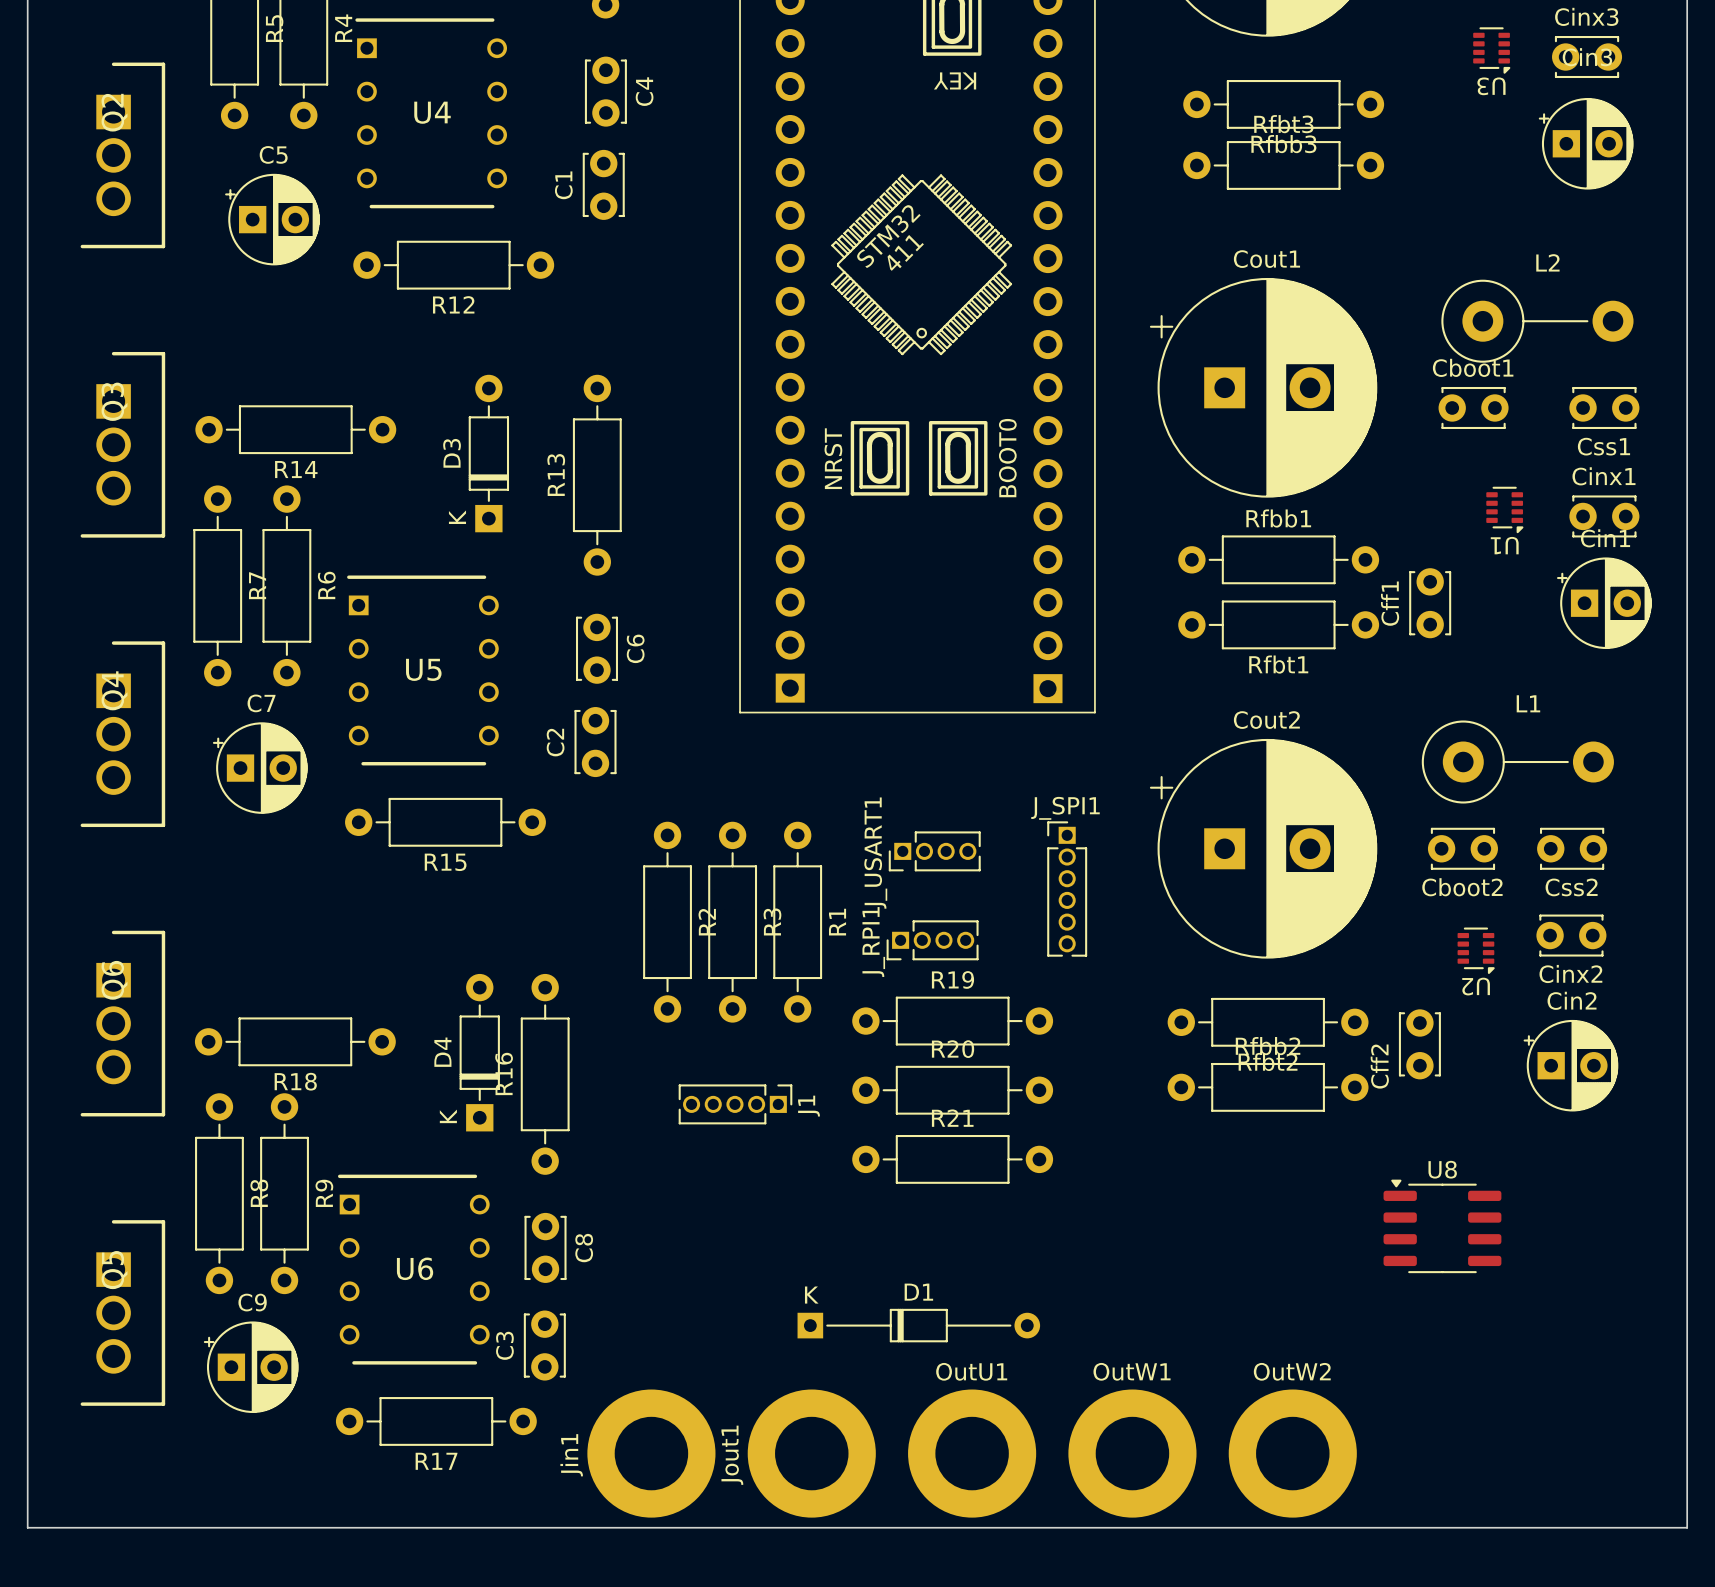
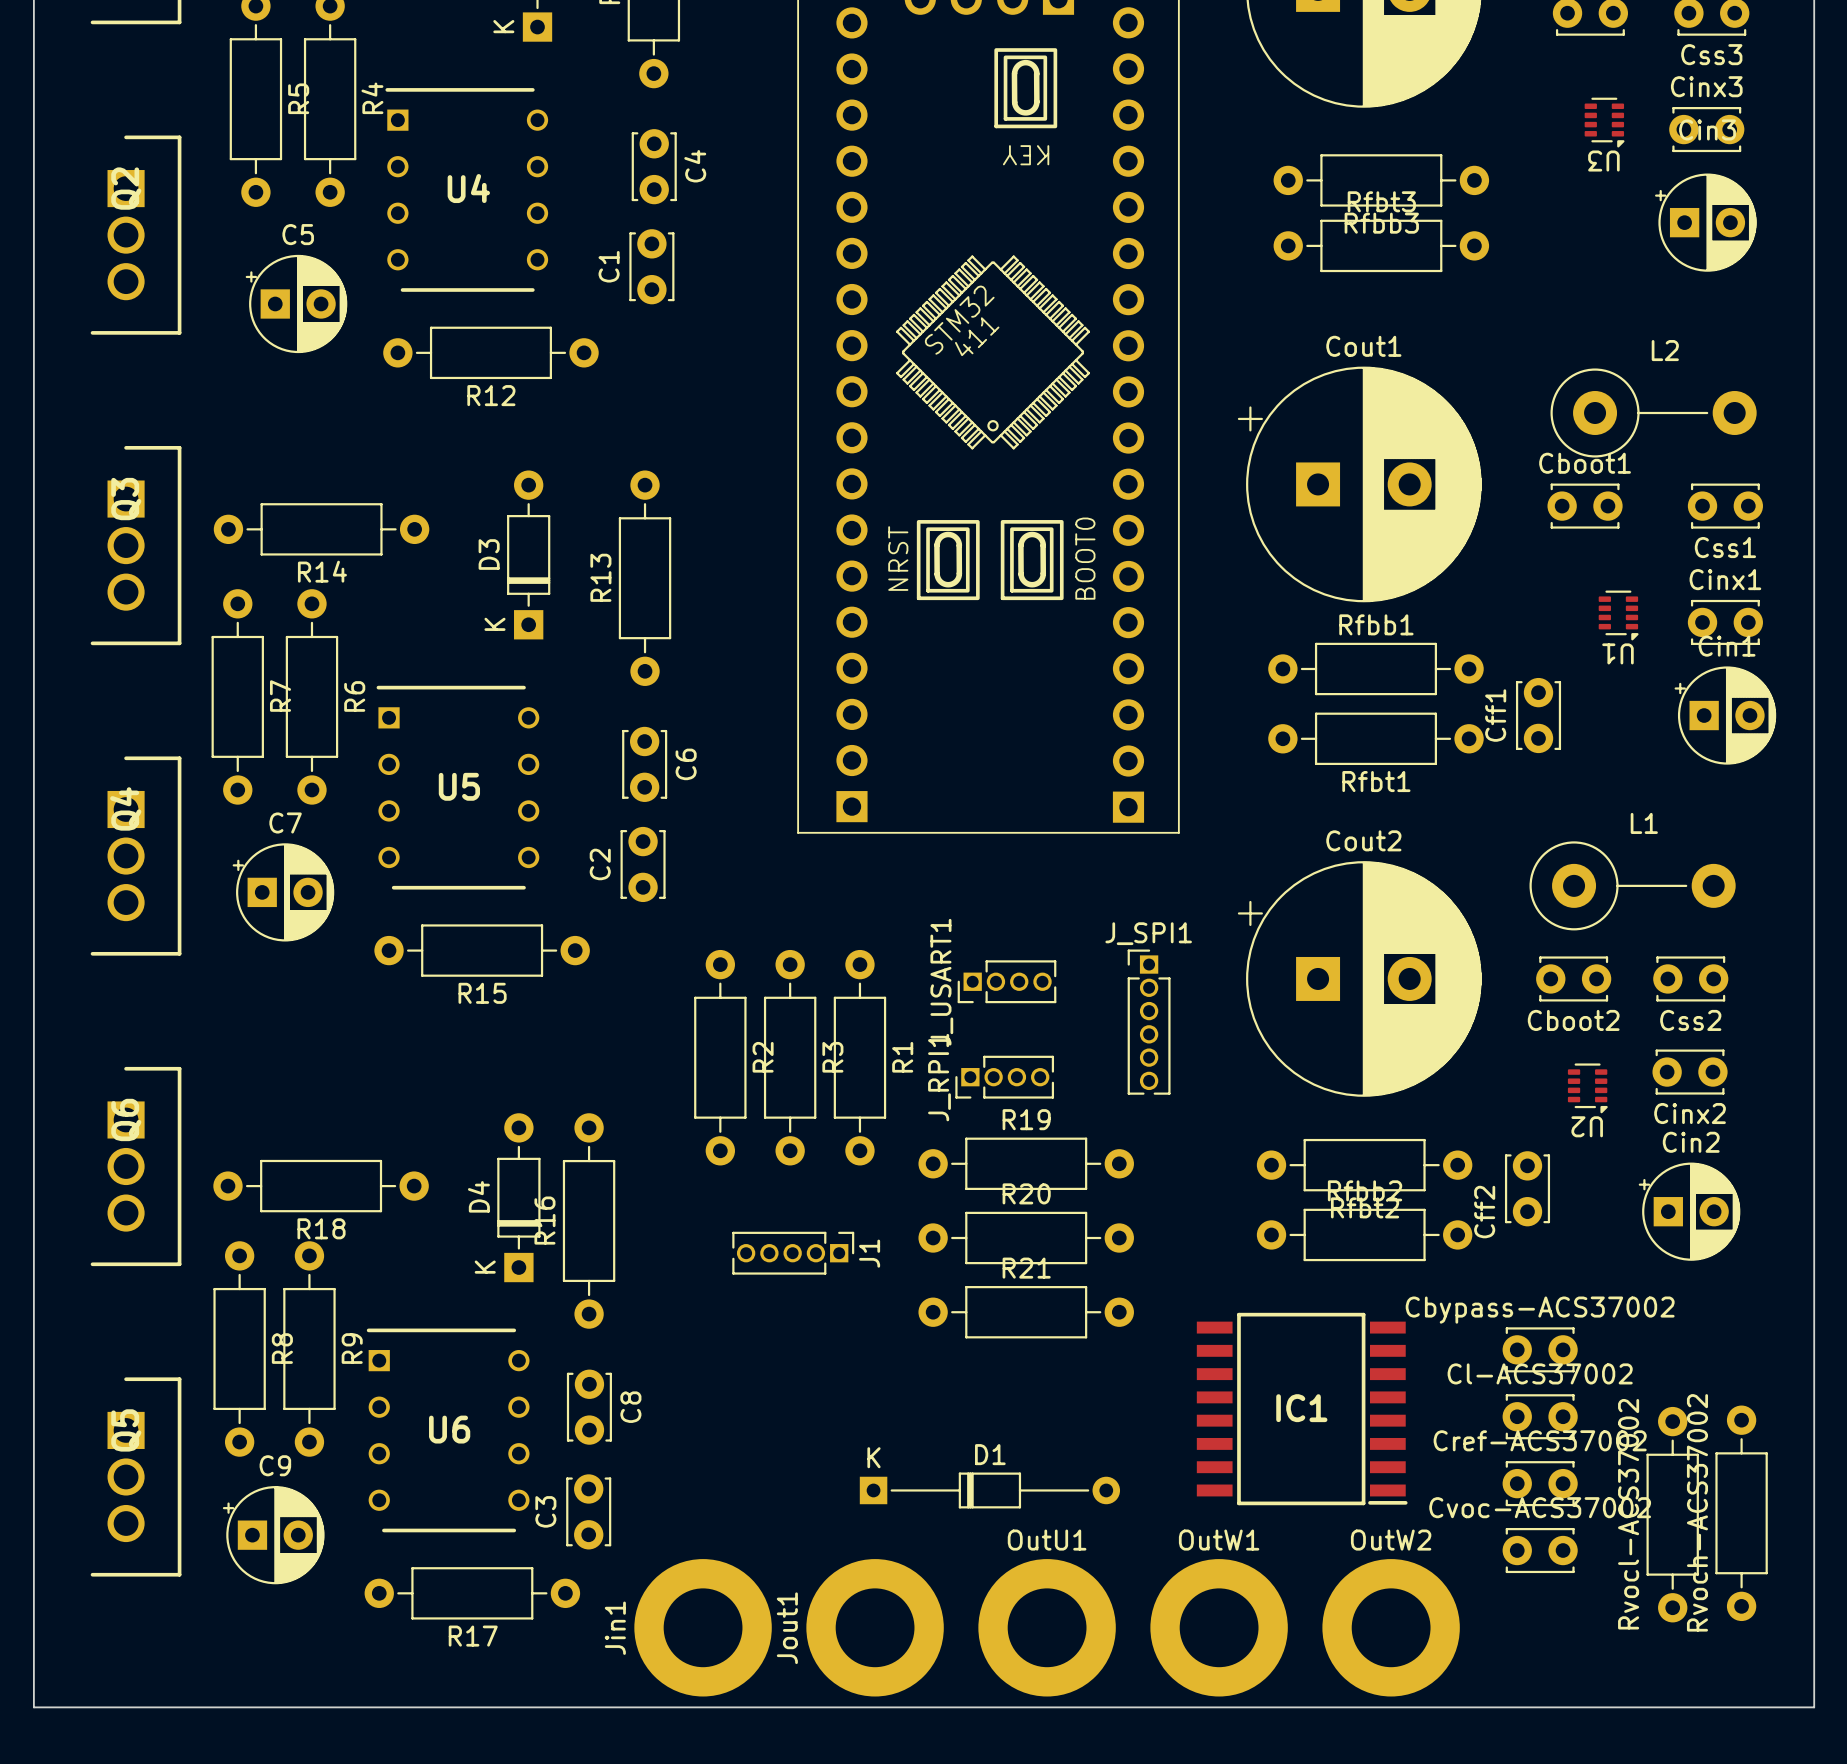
Cbypass-ACS37002: none -> (1540, 1349)
U8: (1442, 1226) -> none
IC1: none -> (1302, 1409)
Cl-ACS37002: none -> (1540, 1416)
Cref-ACS37002: none -> (1540, 1483)
Rvoch-ACS37002: none -> (1741, 1513)
Rvocl-ACS37002: none -> (1672, 1514)
Cvoc-ACS37002: none -> (1540, 1550)

